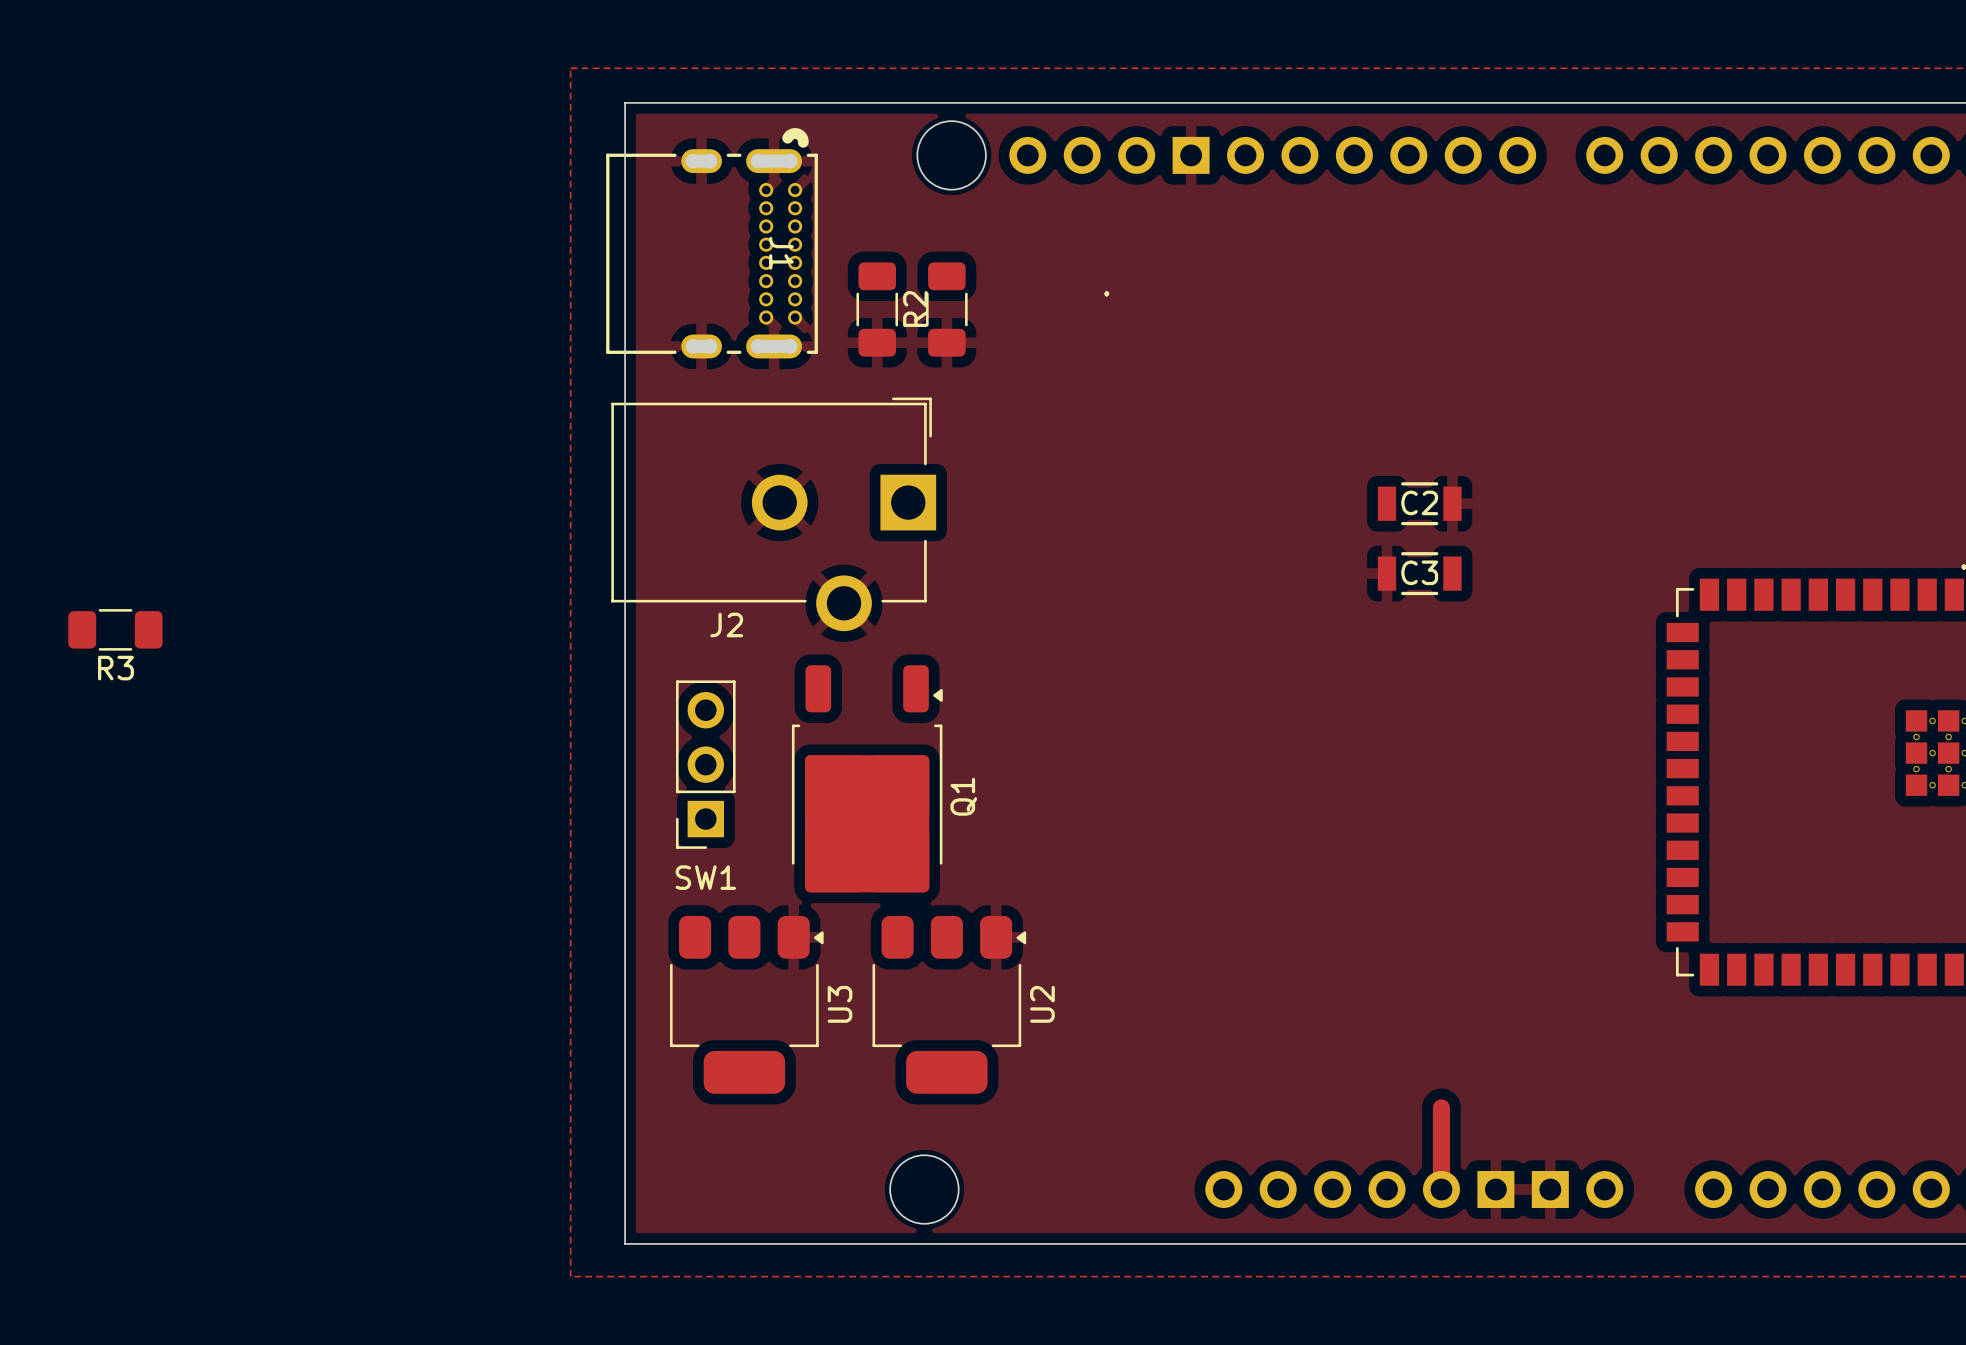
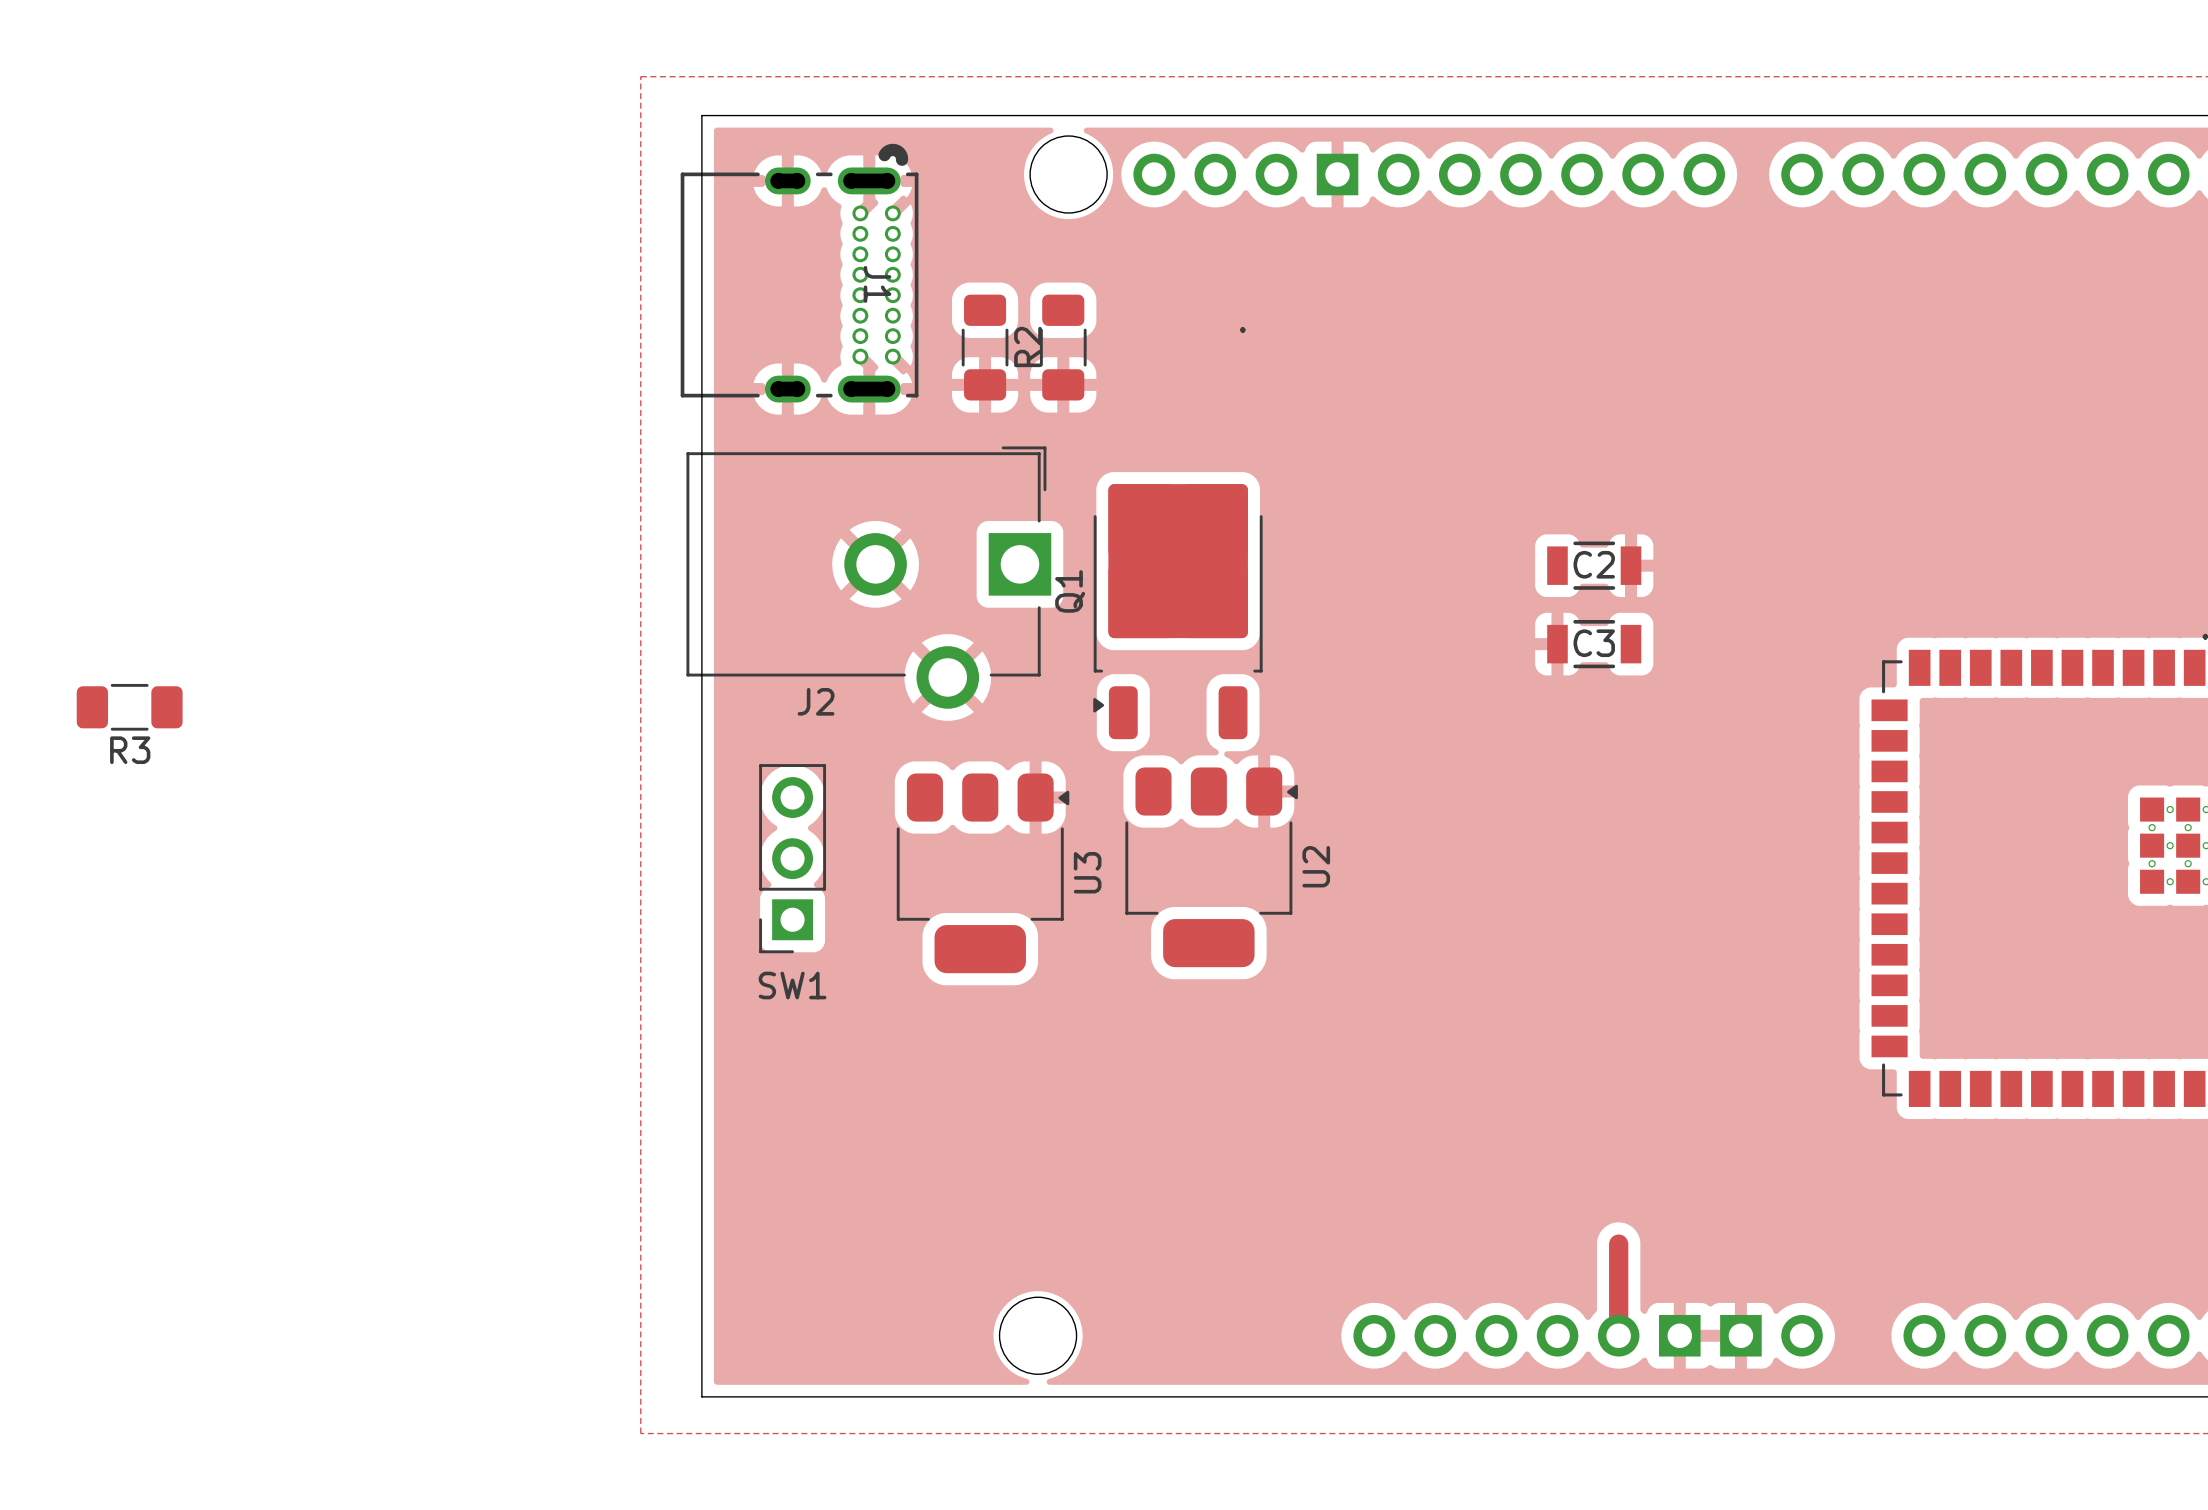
Q1 rotation: 0° (867, 778) -> 180° (1177, 611)
Q1 position: (867, 778) -> (1177, 611)
U3 position: (746, 1004) -> (983, 873)
U2 position: (949, 1004) -> (1211, 867)

